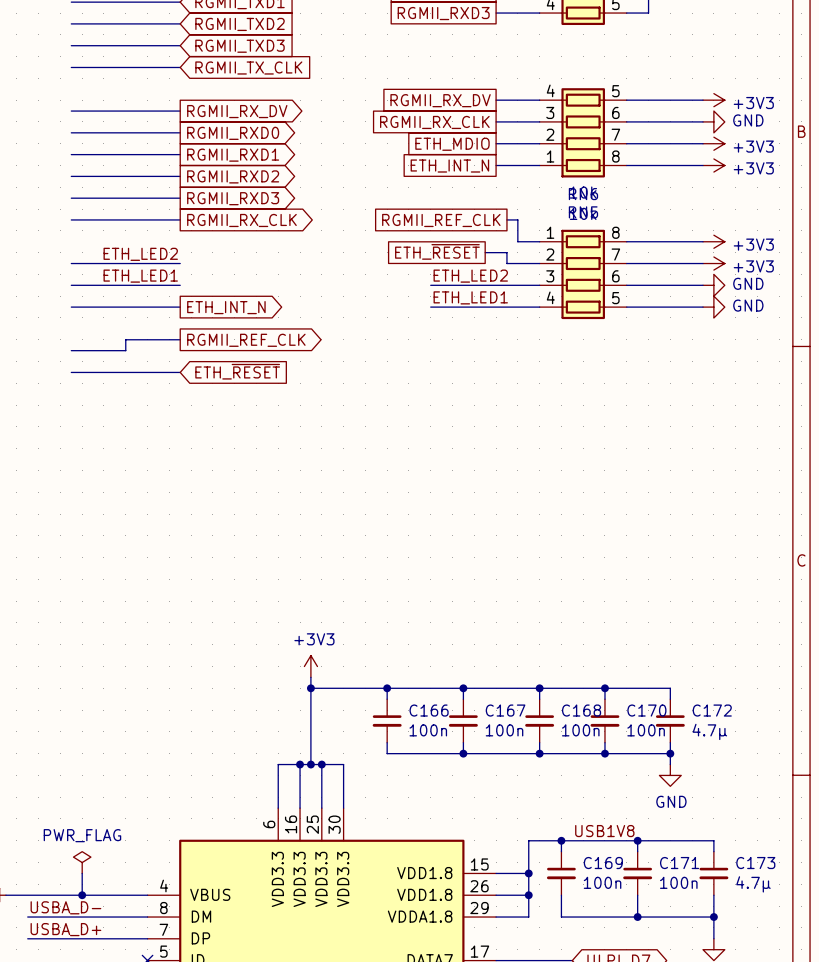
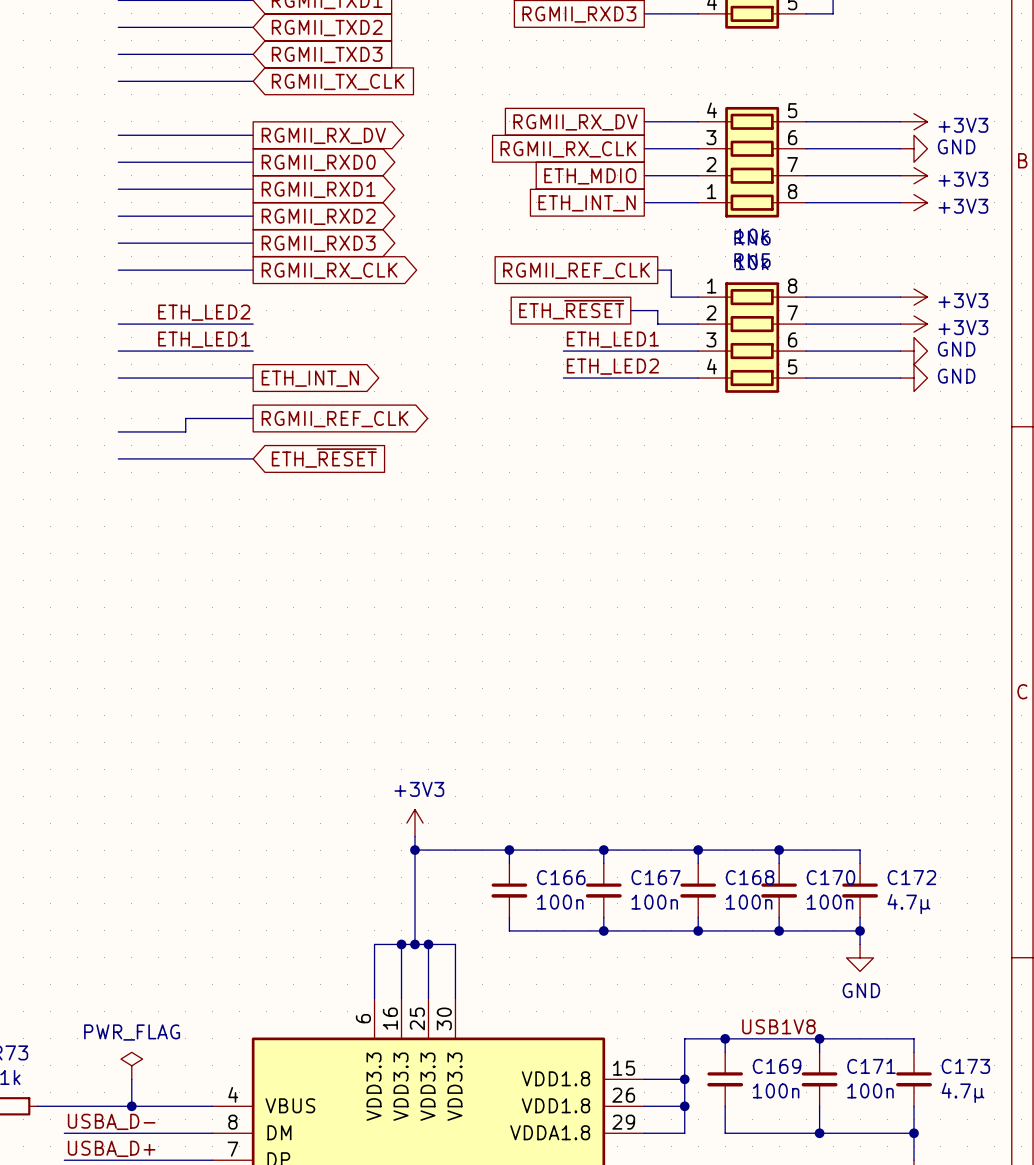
label: ETH_LED2 (470, 276) -> ETH_LED1 (612, 339)
label: ETH_LED1 (470, 297) -> ETH_LED2 (612, 366)

